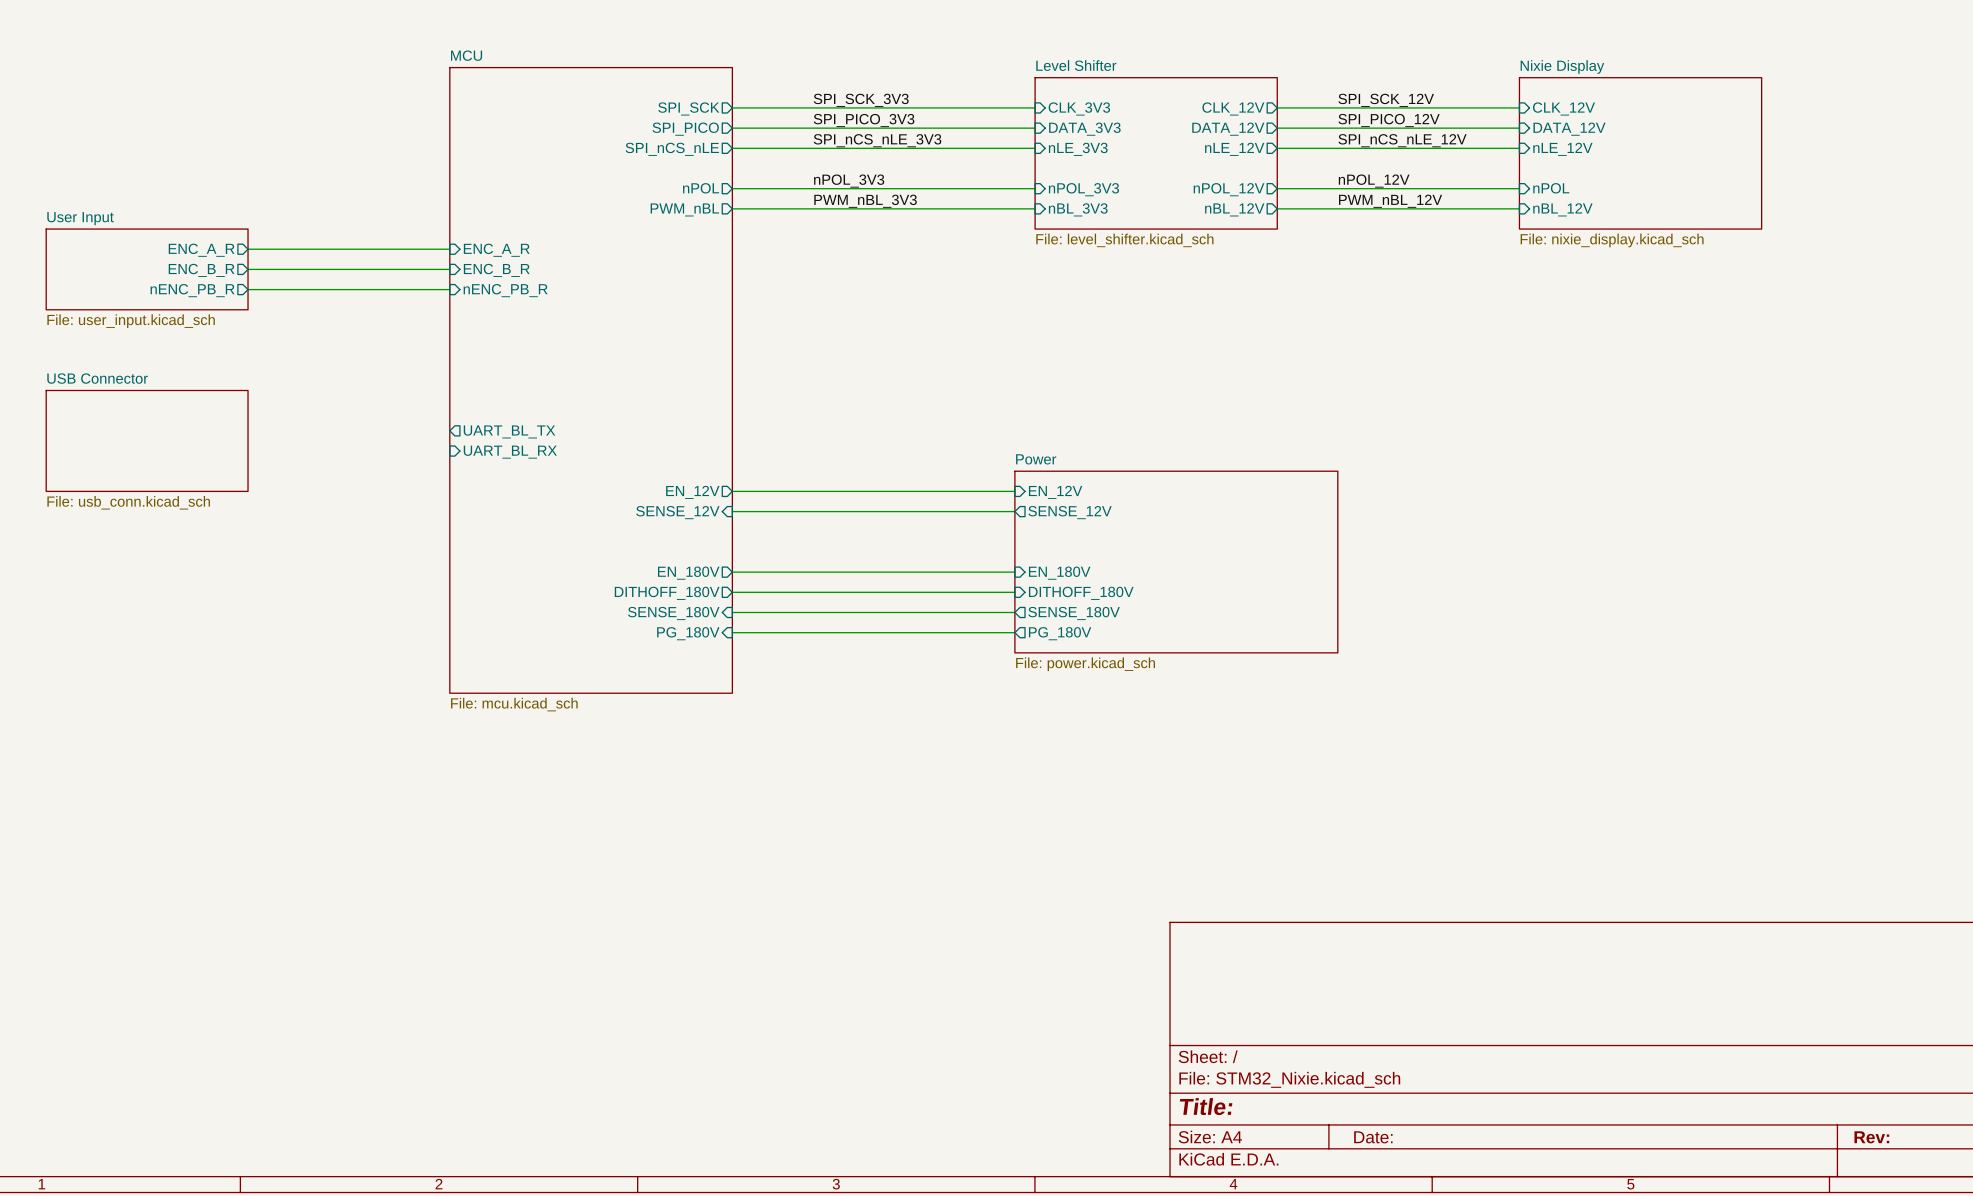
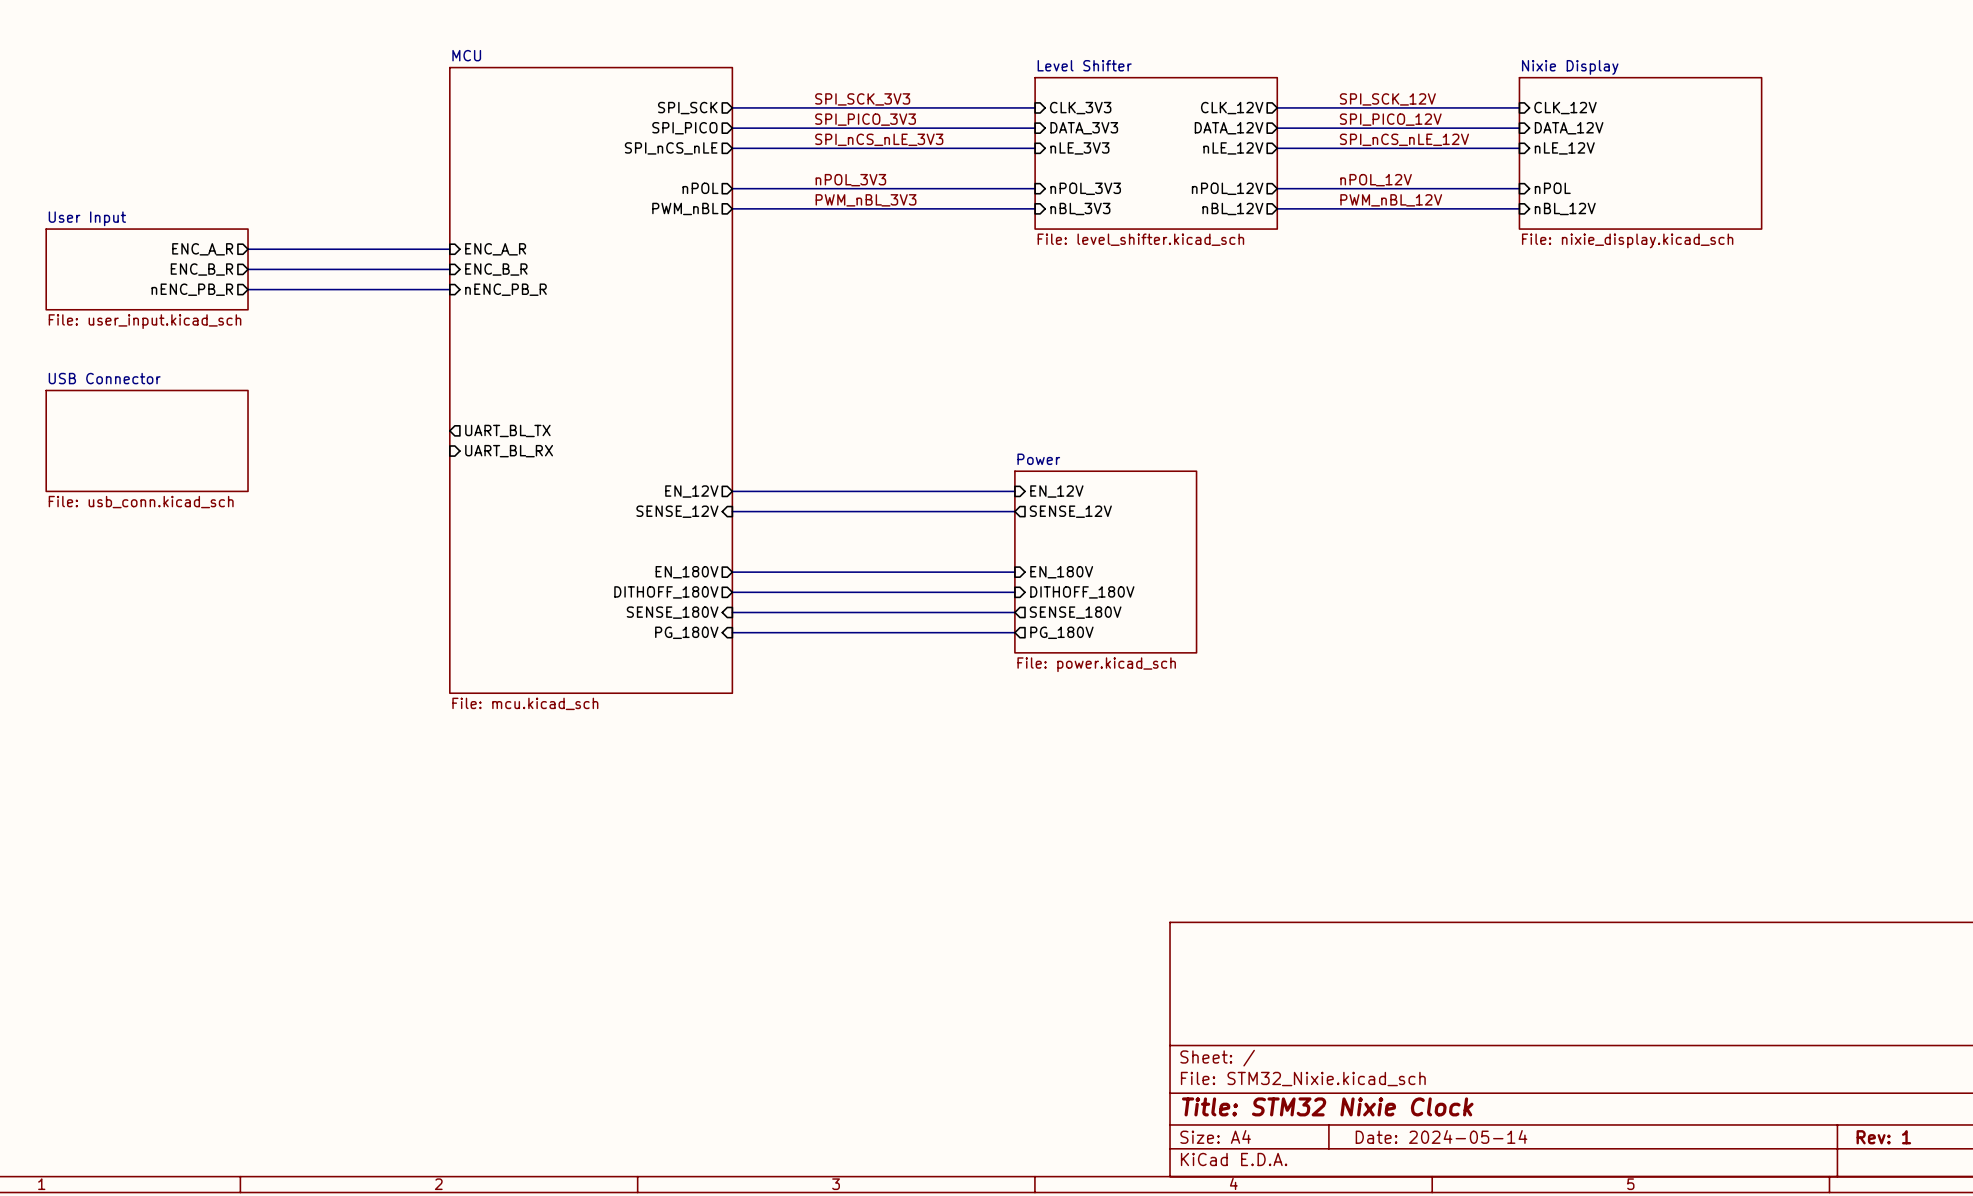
sheet Power: none -> File: power.kicad_sch (1105, 562)
sheet Power: File: power.kicad_sch (1176, 562) -> none
title block: Title: (1206, 1106) -> Title: STM32 Nixie Clock (1327, 1106)
title block: Date: (1373, 1137) -> Date: 2024-05-14 (1441, 1136)
title block: Rev: (1871, 1137) -> Rev: 1 (1883, 1137)

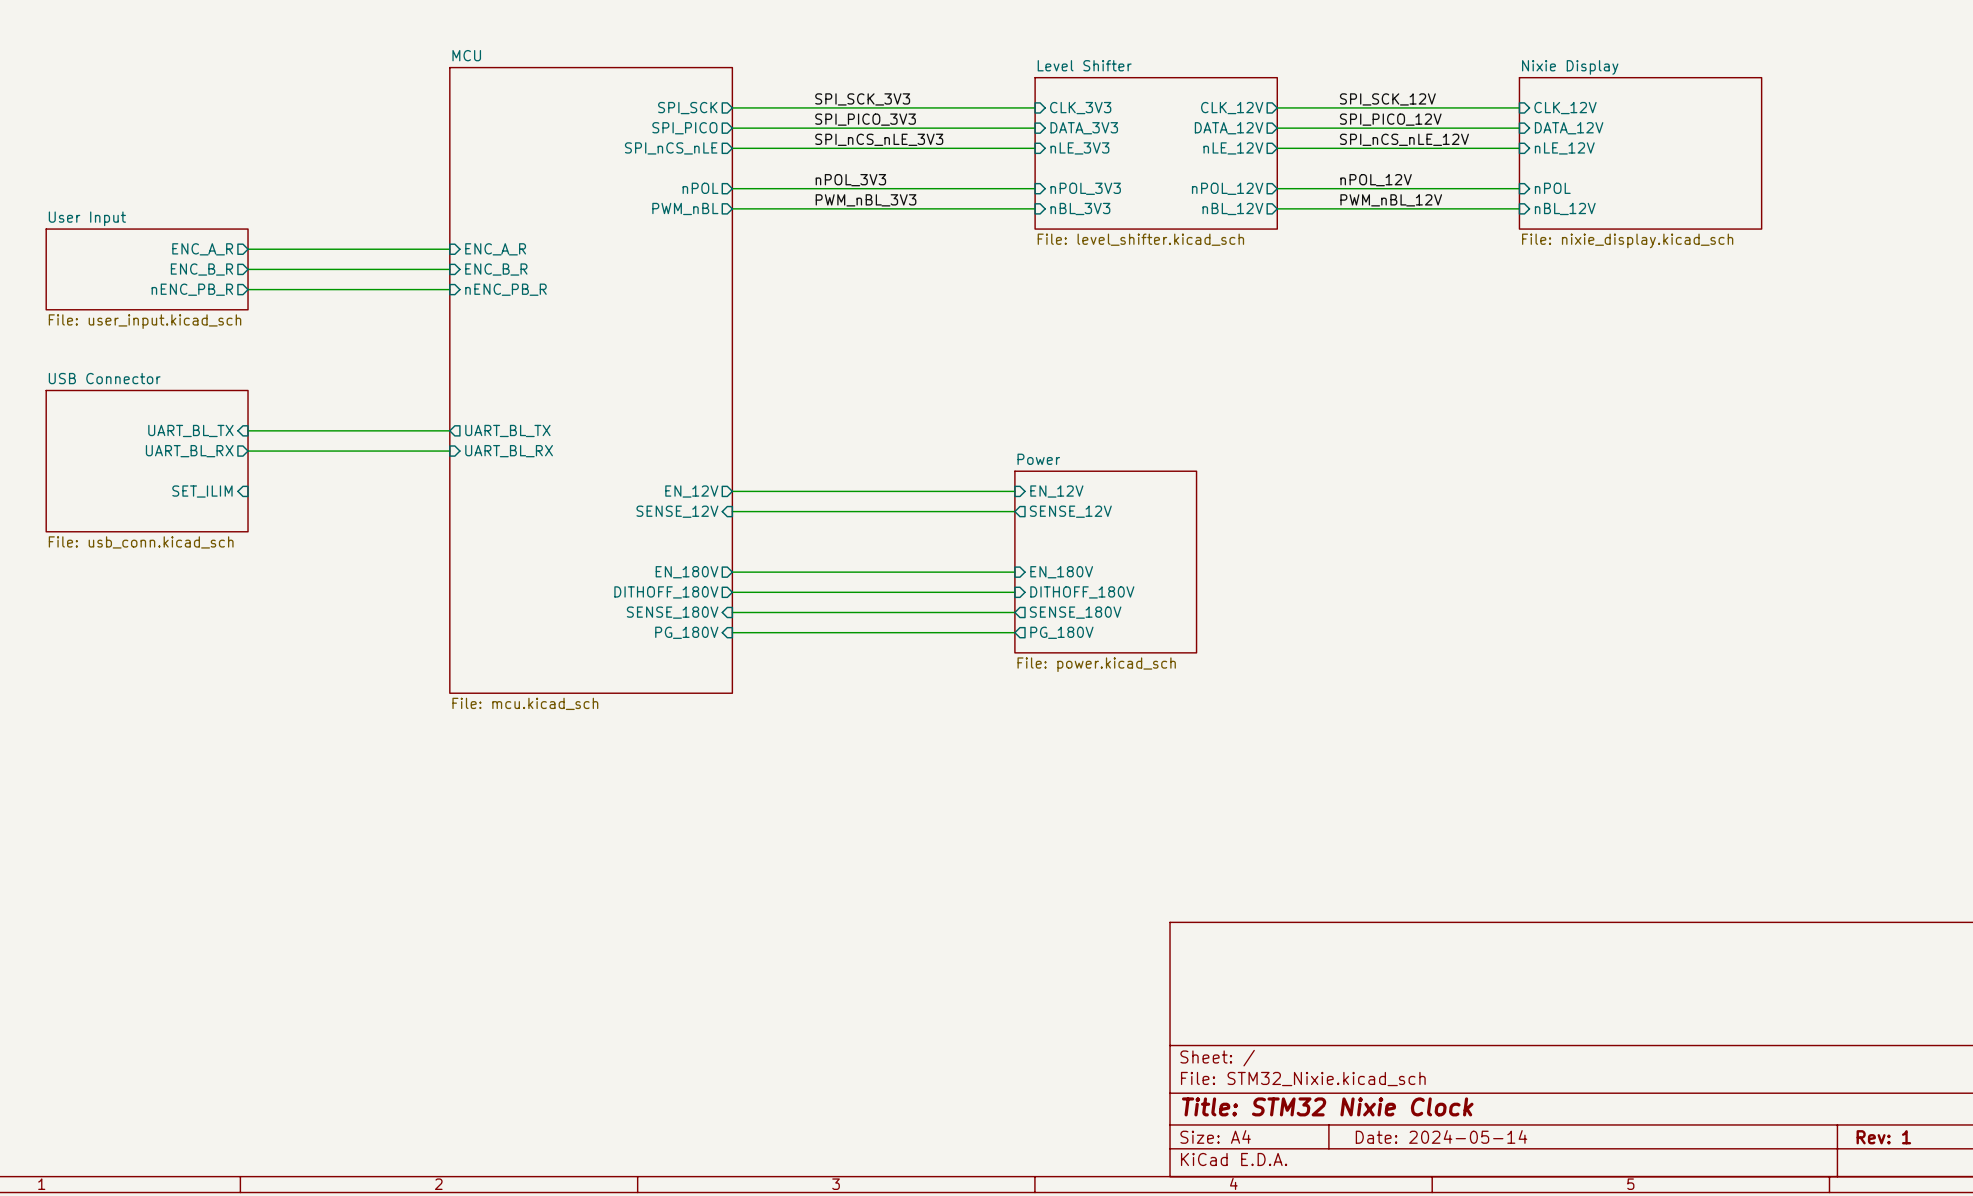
sheet pin: none -> UART_BL_TX (190, 430)
wire: none -> (248, 430) (449, 430)
sheet USB Connector: File: usb_conn.kicad_sch (147, 440) -> none
sheet pin: none -> UART_BL_RX (189, 451)
wire: none -> (248, 451) (449, 451)
sheet USB Connector: none -> File: usb_conn.kicad_sch (147, 461)
sheet pin: none -> SET_ILIM (202, 491)

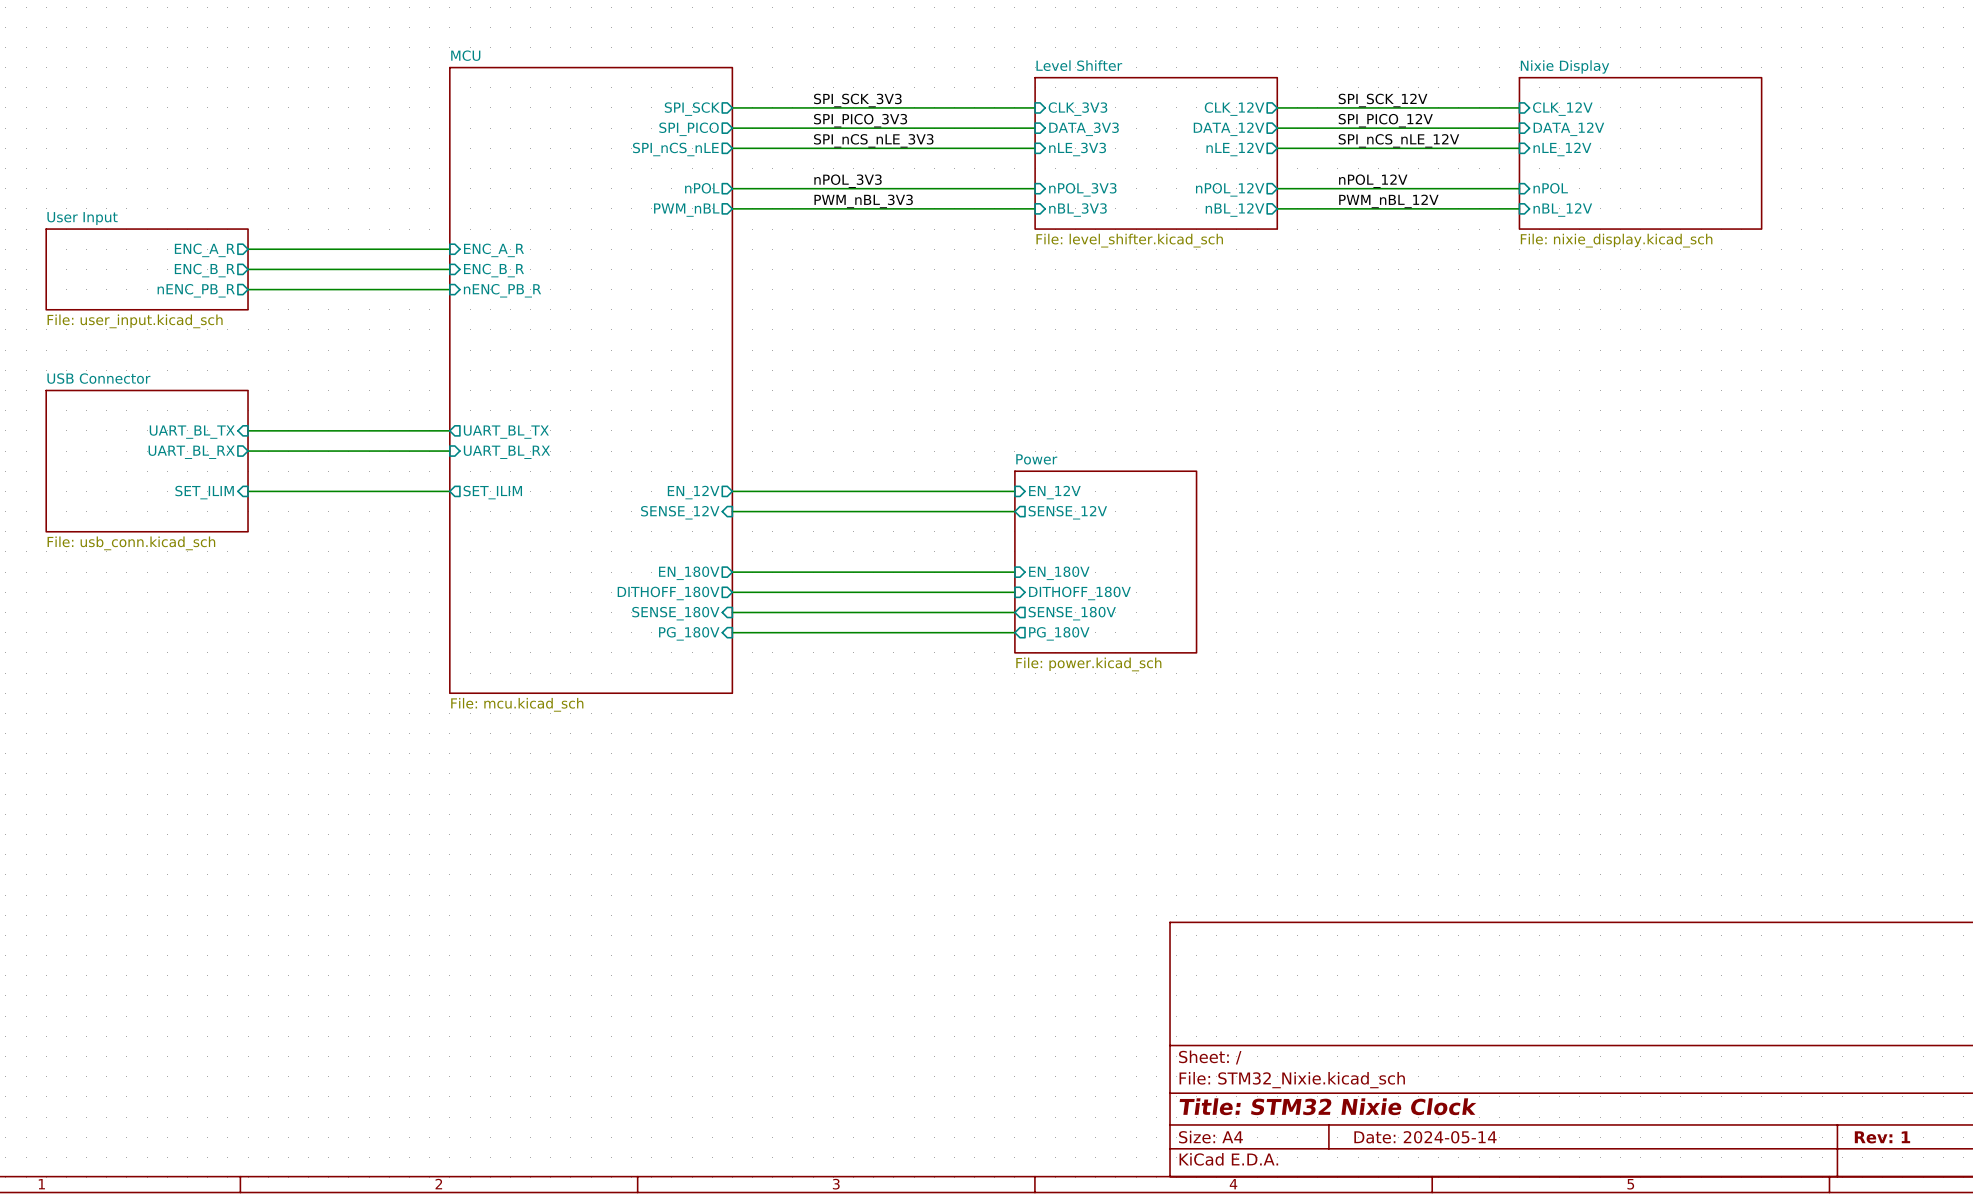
wire: none -> (248, 491) (449, 491)
sheet pin: none -> SET_ILIM (492, 492)

